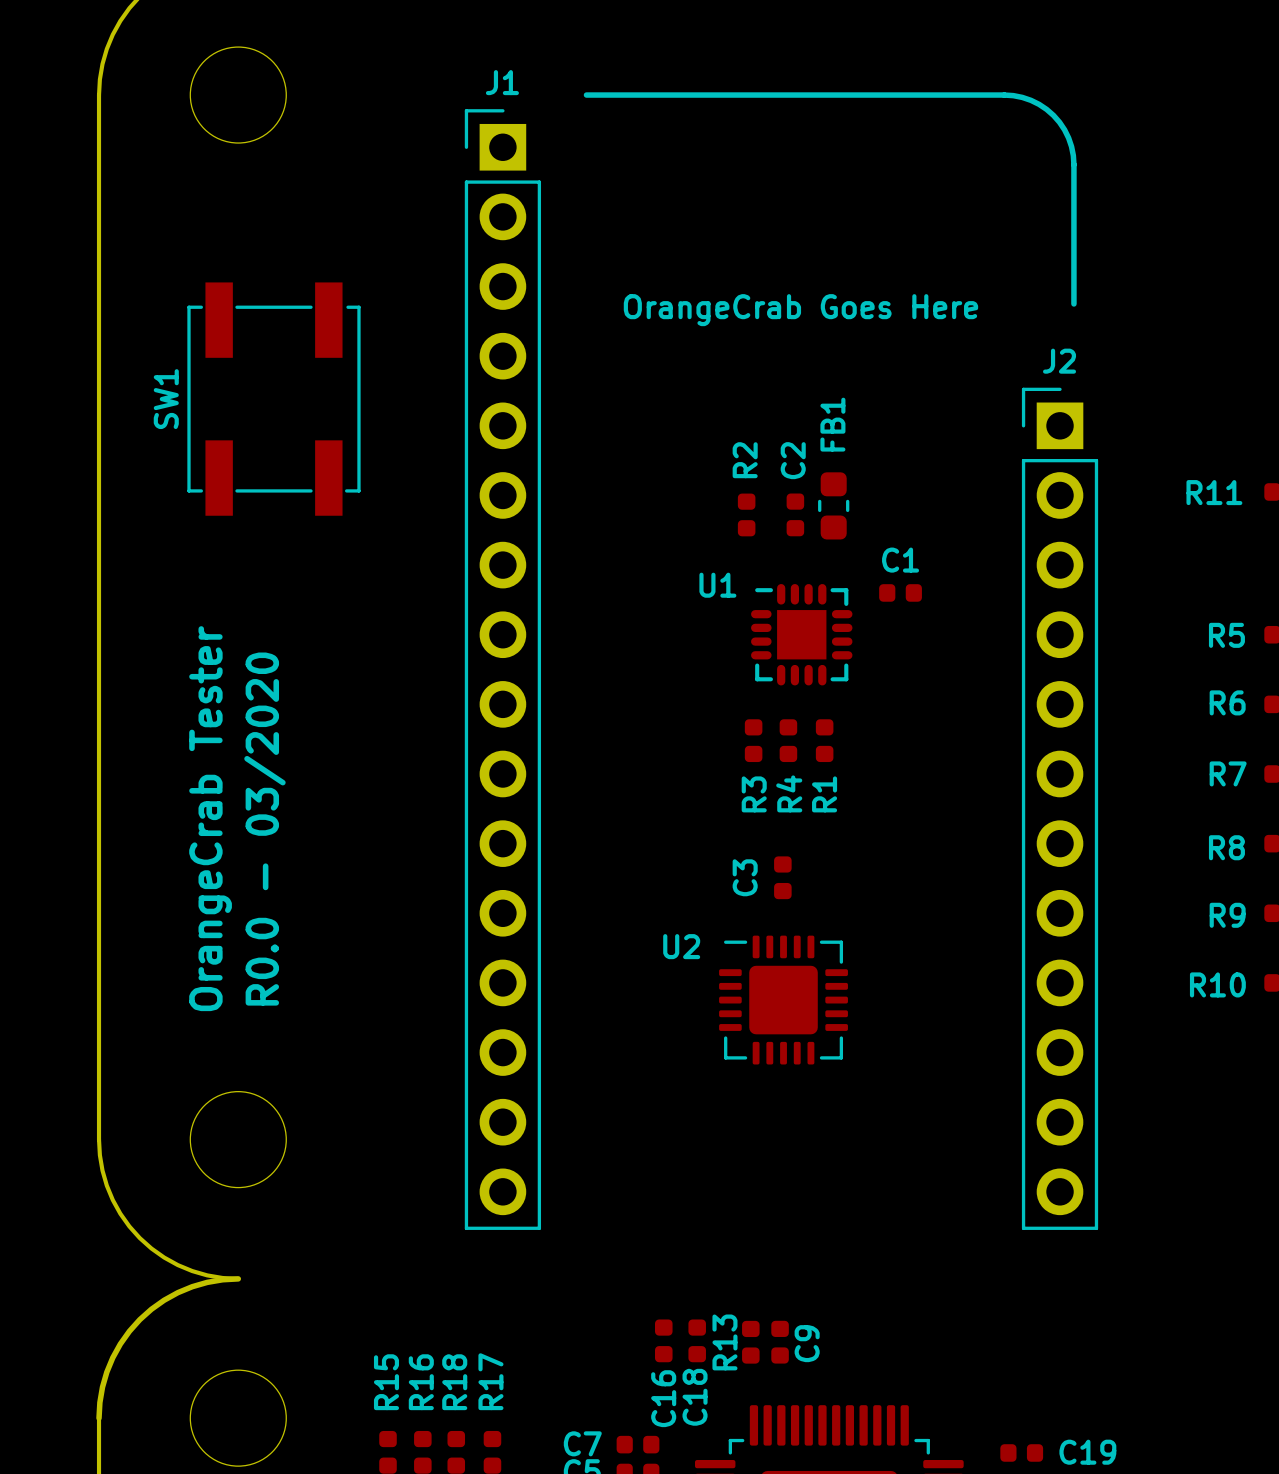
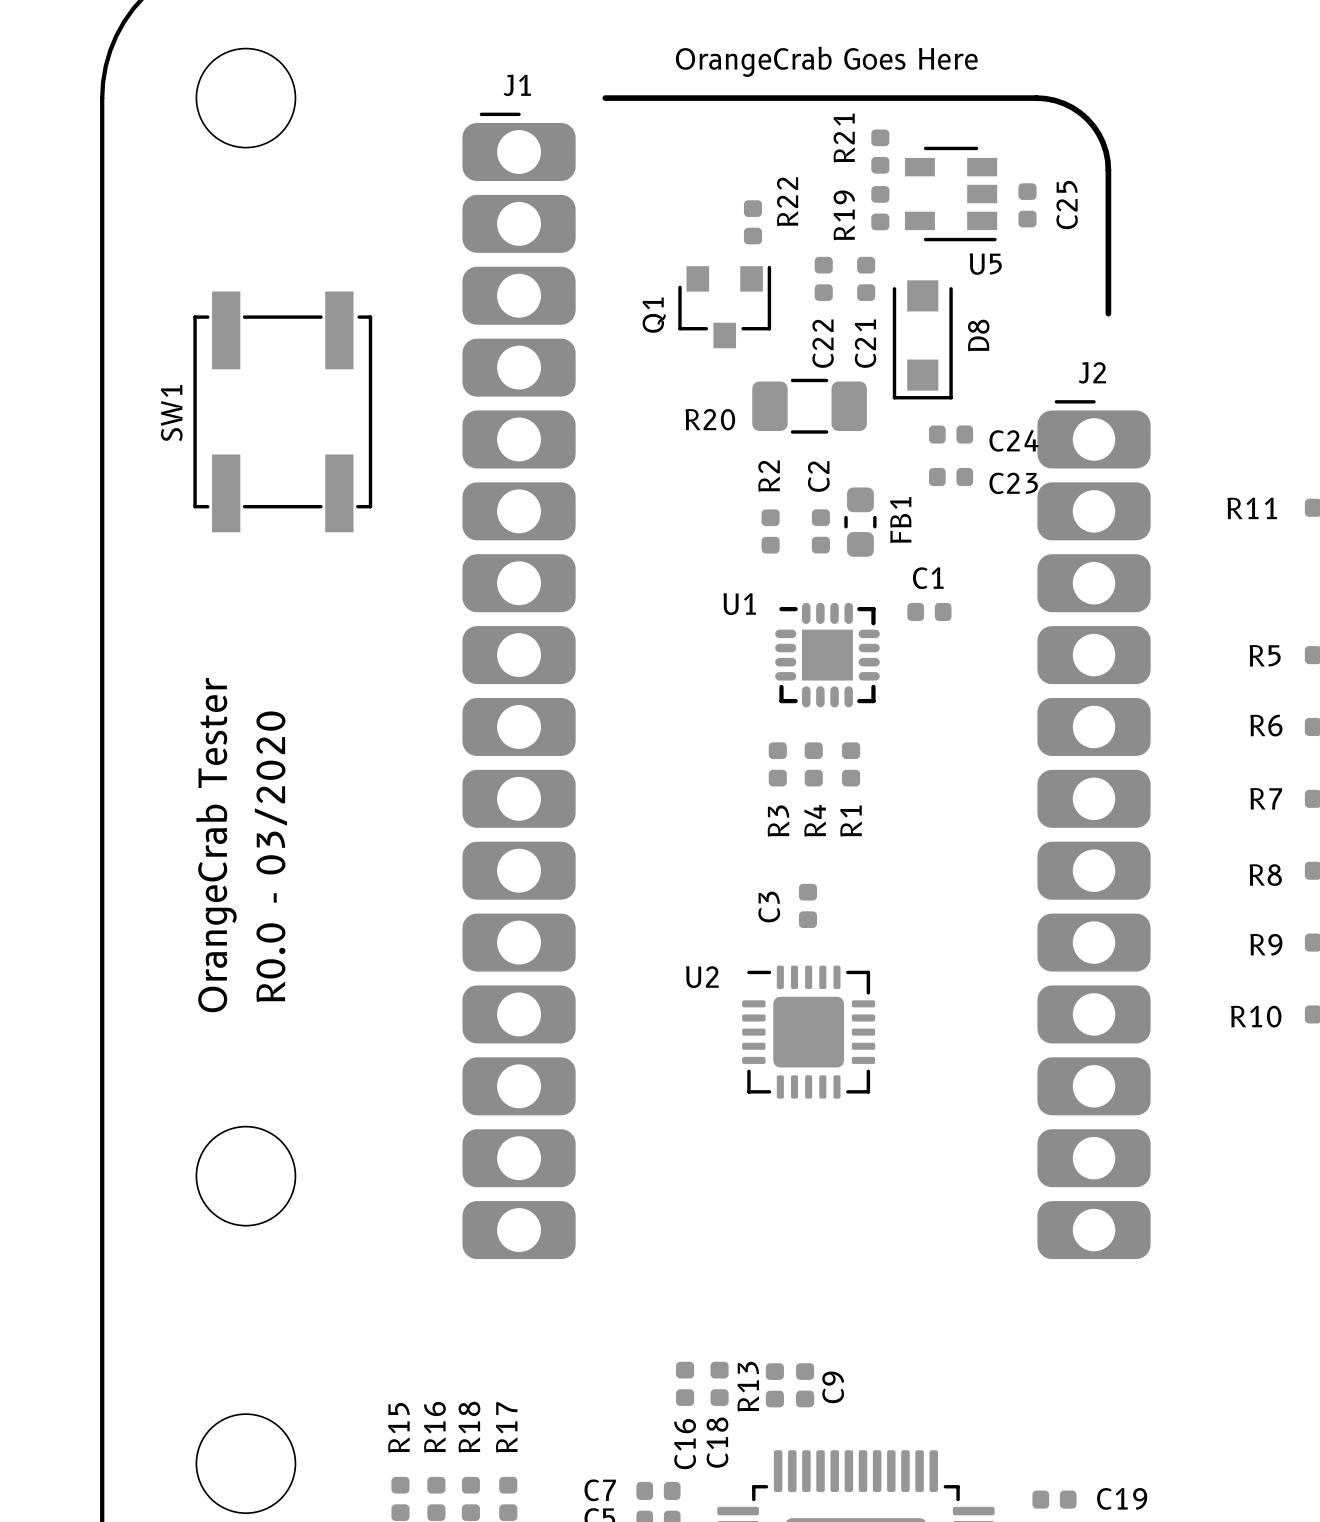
J1 footprint: [464, 109, 542, 1230] -> [462, 112, 576, 1260]
R21: none -> (880, 151)
U5: none -> (951, 194)
C25: none -> (1027, 205)
R19: none -> (880, 208)
R22: none -> (752, 222)
C22: none -> (823, 278)
C21: none -> (866, 278)
Q1: none -> (724, 307)
text position: OrangeCrab Goes Here (800, 310) -> OrangeCrab Goes Here (826, 61)
D8: none -> (922, 339)
J2 footprint: [1021, 387, 1099, 1230] -> [1037, 400, 1151, 1260]
R20: none -> (809, 406)
C24: none -> (951, 434)
FB1 name position: FB1 (832, 424) -> FB1 (900, 520)
C23: none -> (951, 476)
board edge: (99, 1139) (102, 1170) (112, 1200) (129, 1226) (139, 1238) (151, 1248) (177, 1265) (207, 1275) (238, 1278) (207, 1282) (177, 1292) (151, 1309) (139, 1319) (129, 1331) (112, 1357) (102, 1387) (99, 1418) -> (102, 1176) (102, 1463)

